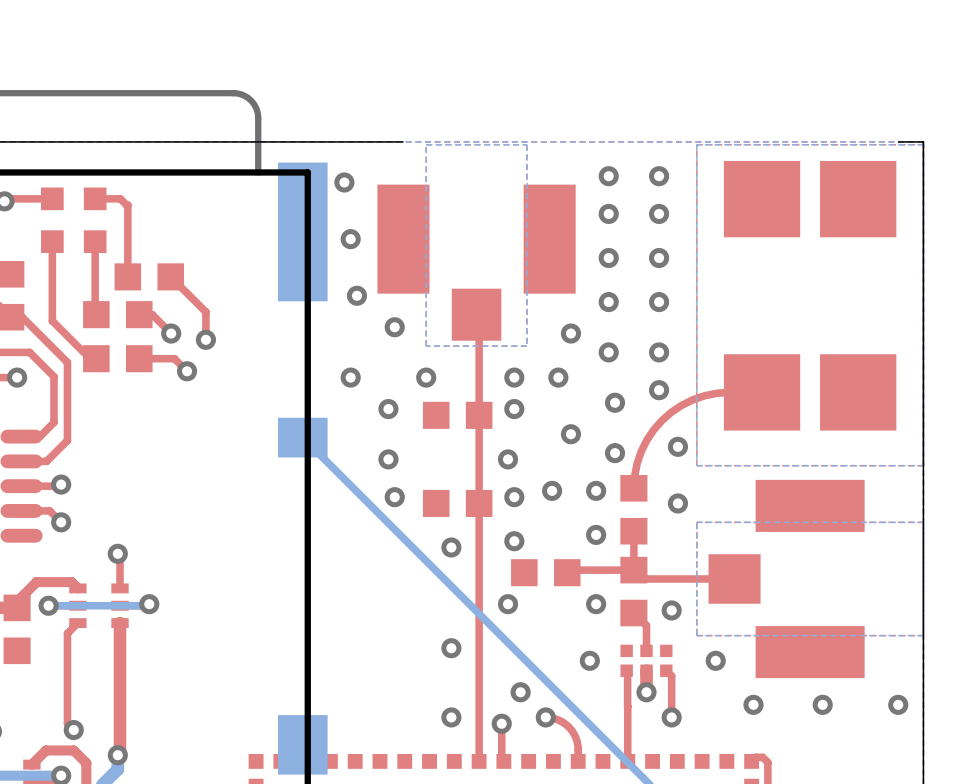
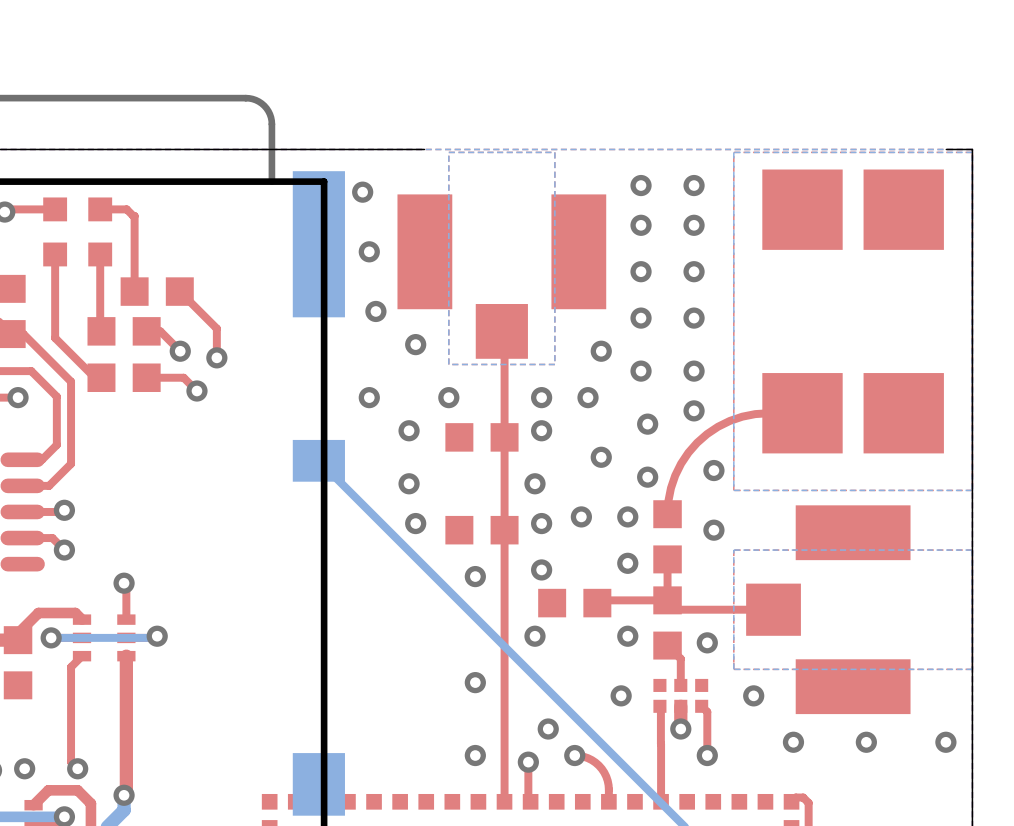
via: none -> (24, 768)

